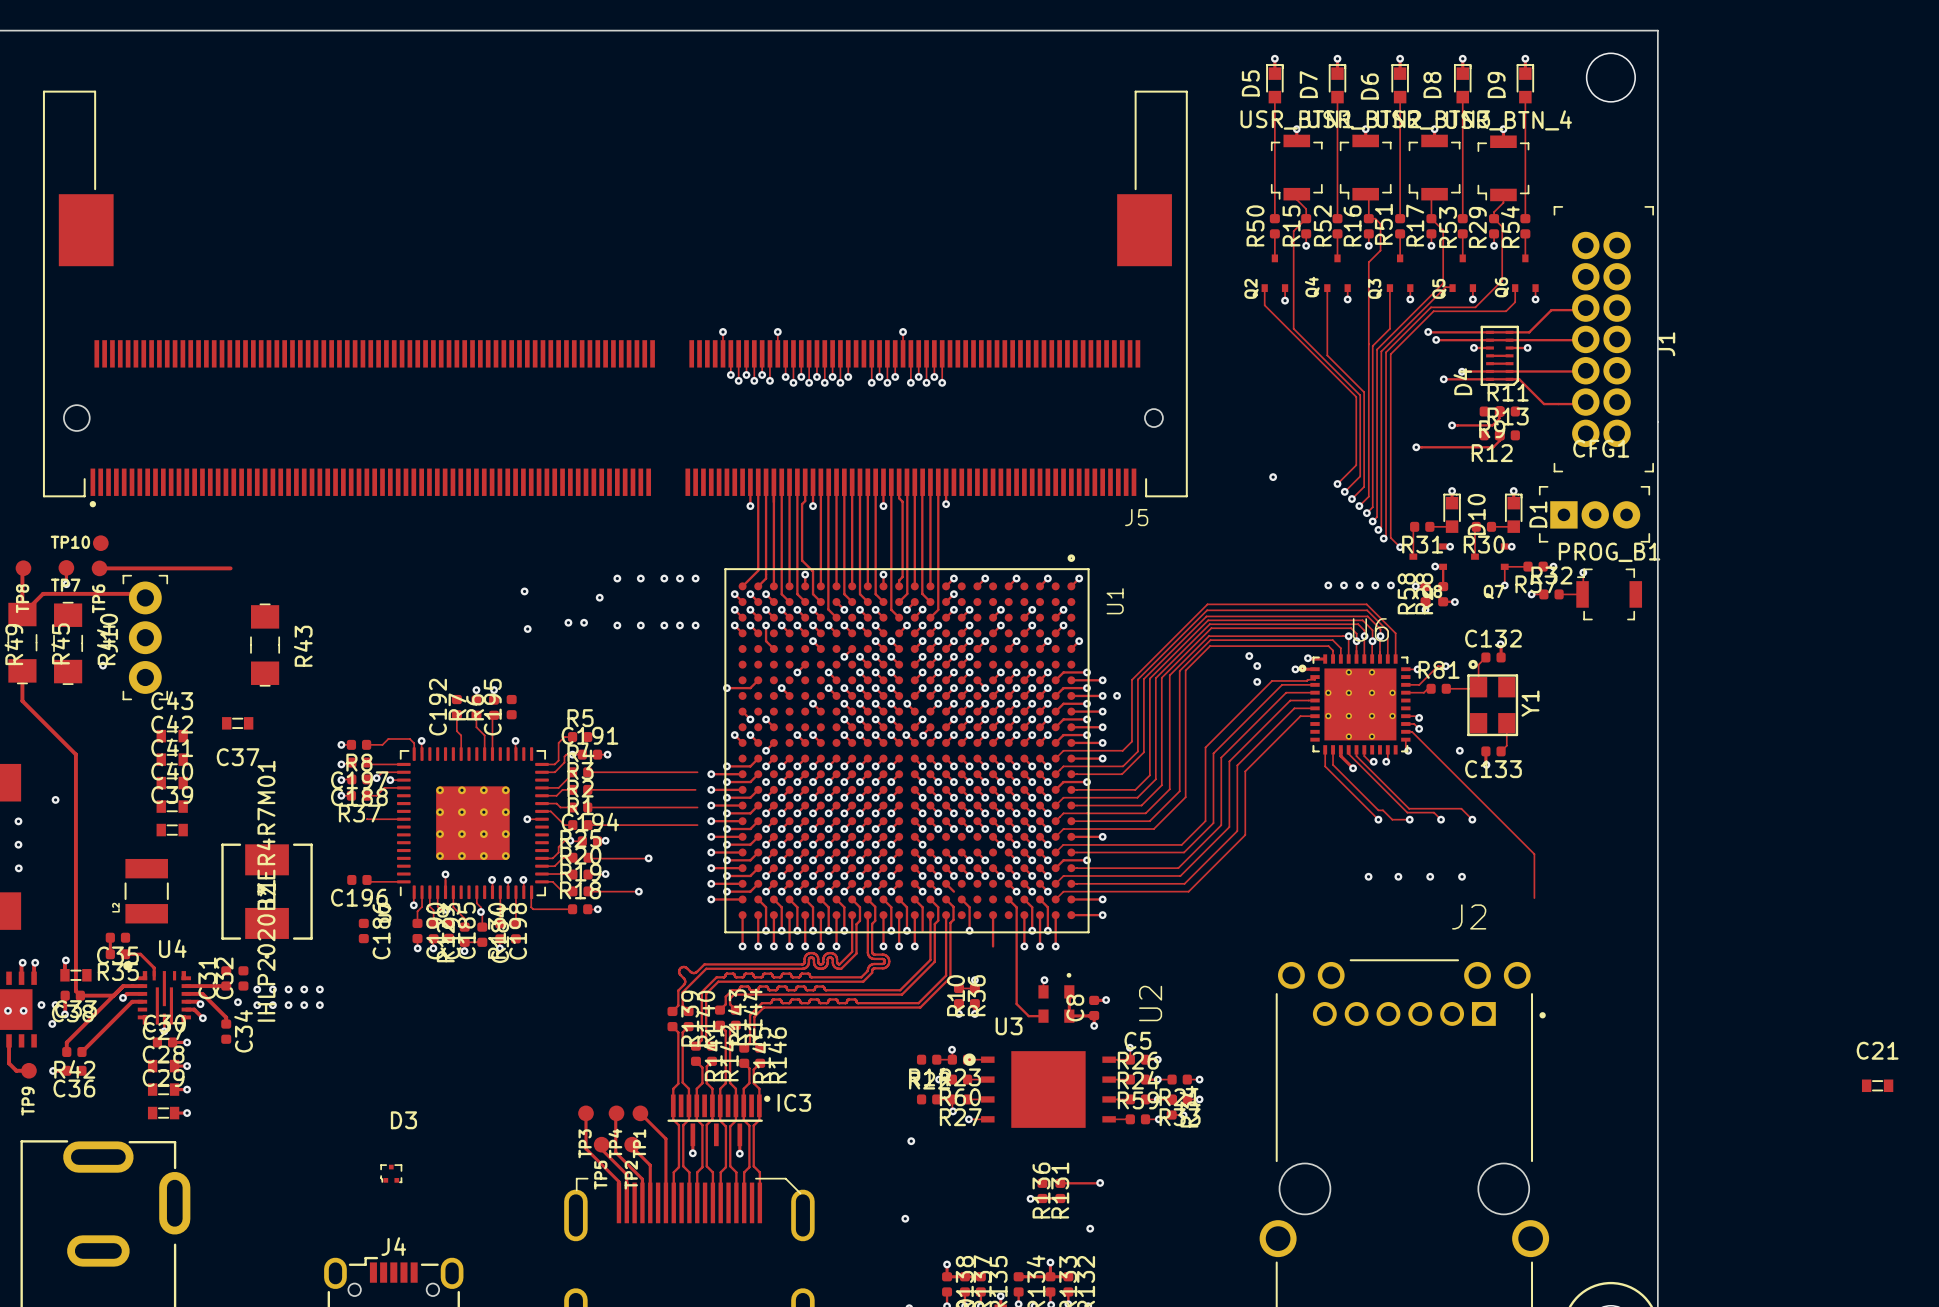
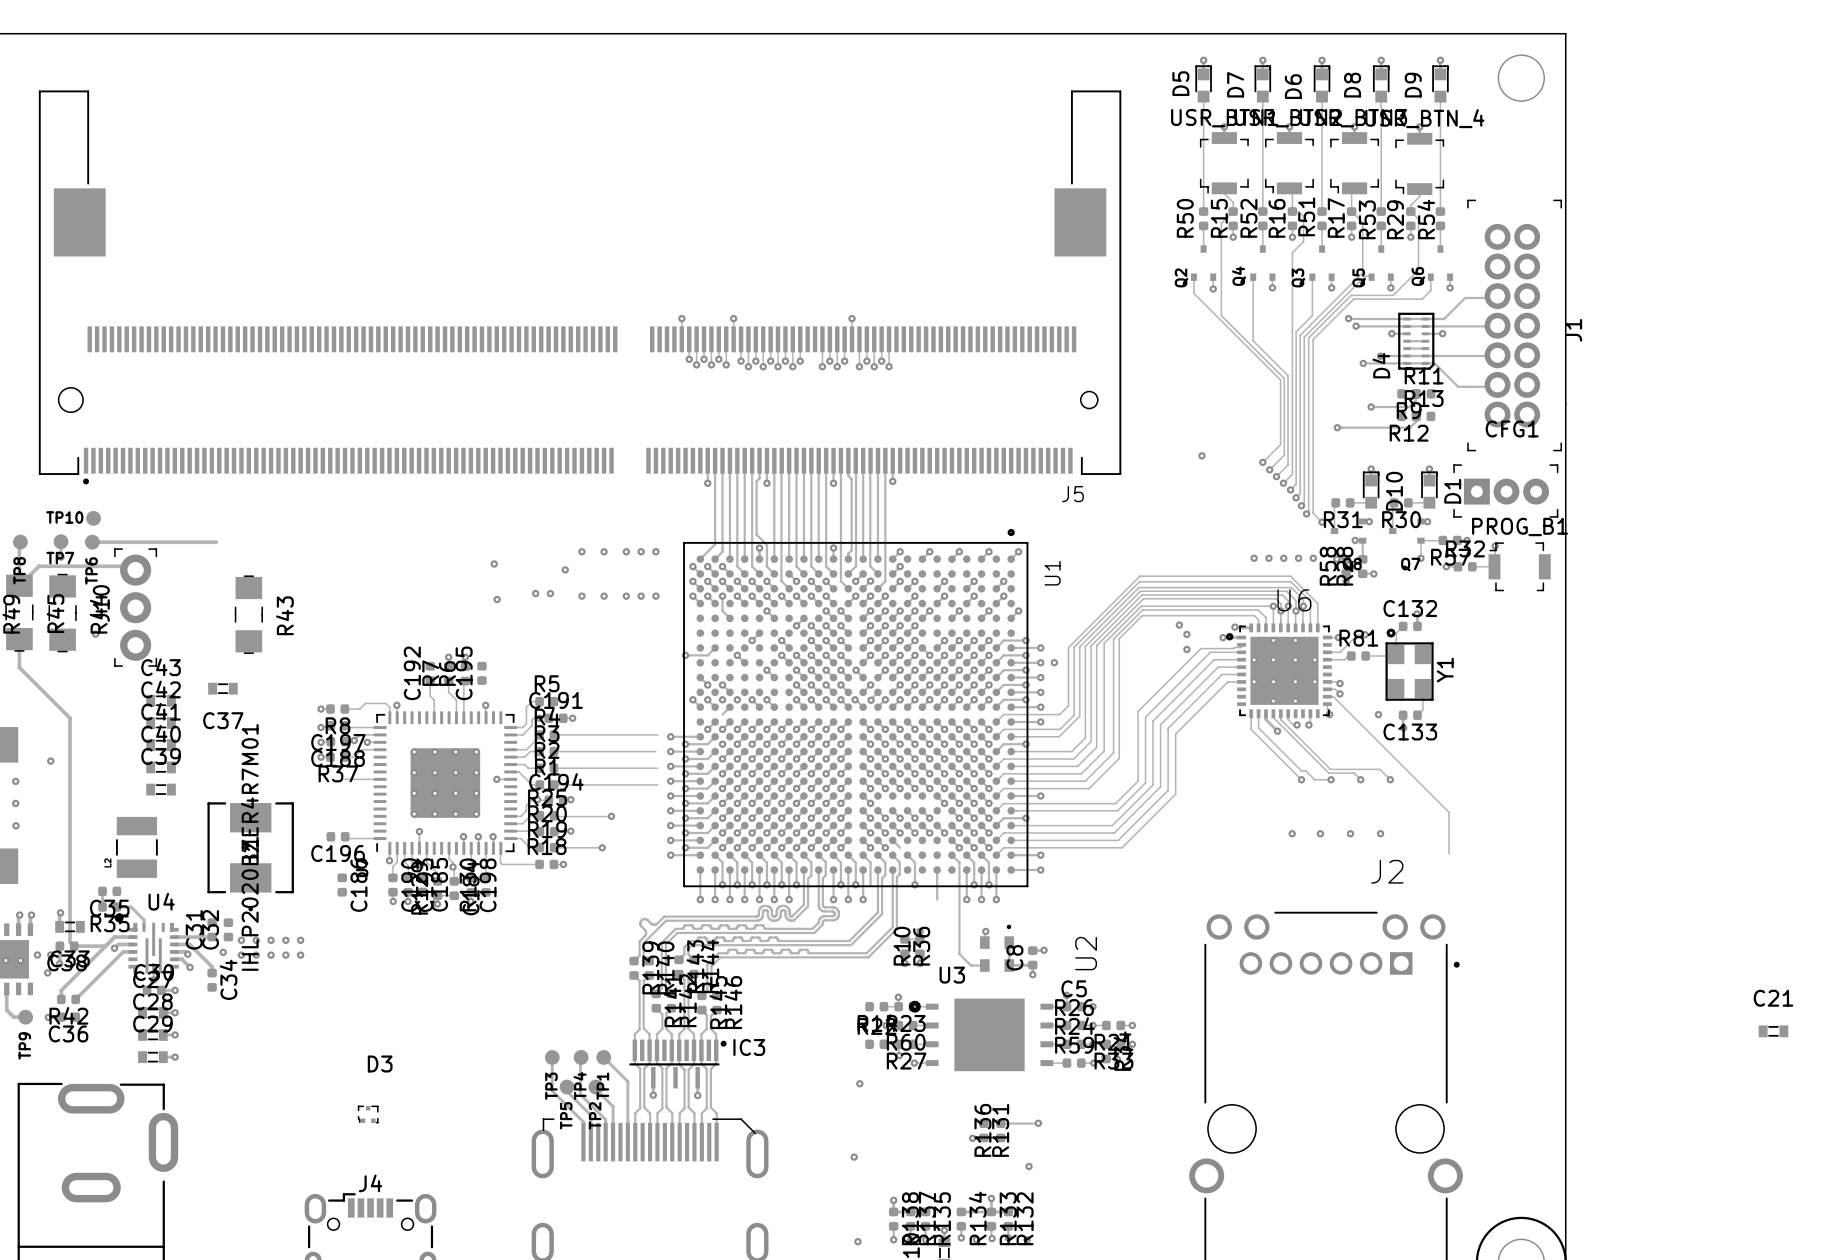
via: none -> (722, 699)
via: none -> (737, 699)
via: (766, 750) -> none
track: (726, 766) (750, 766) -> none
via: (726, 766) -> none
via: none -> (707, 729)

